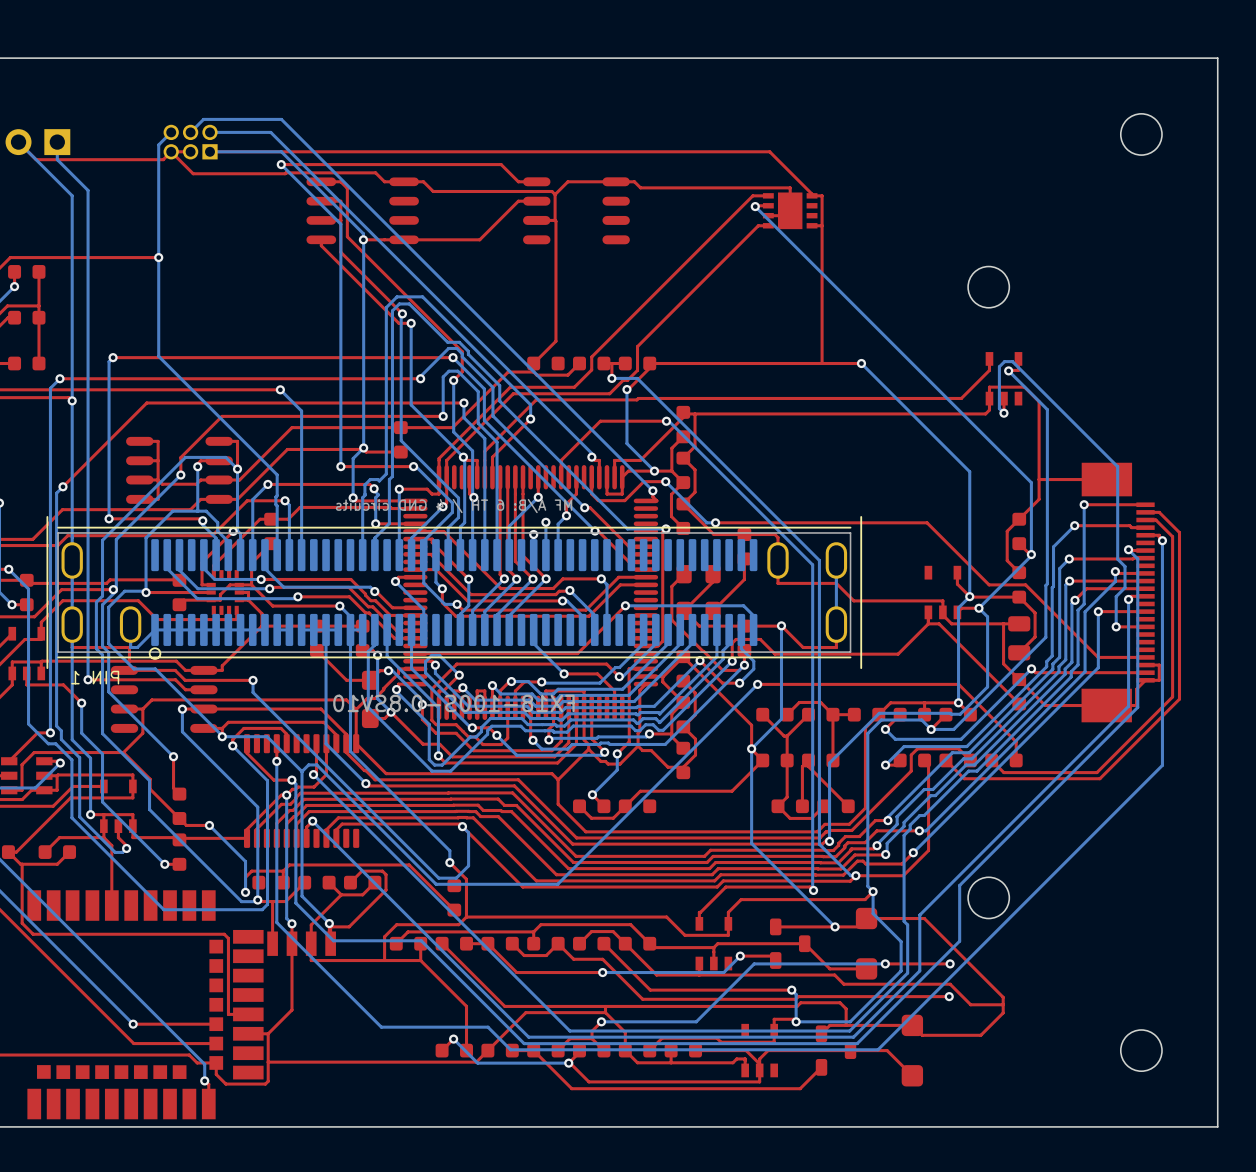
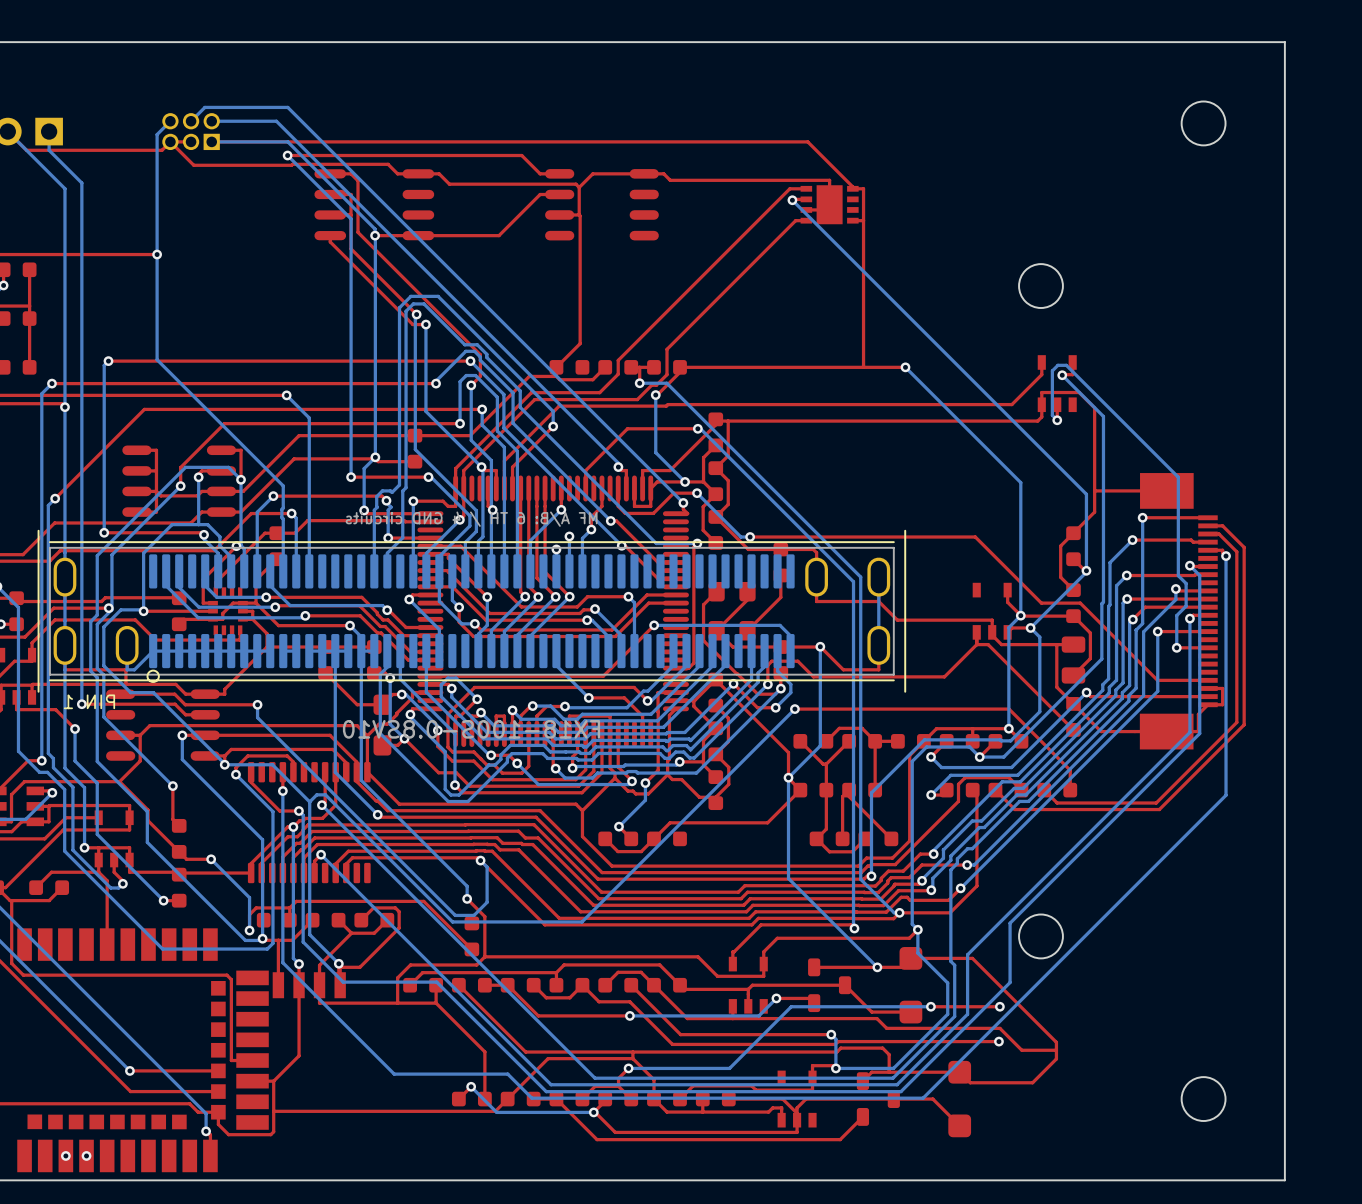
via: none -> (65, 1155)
via: none -> (86, 1155)

